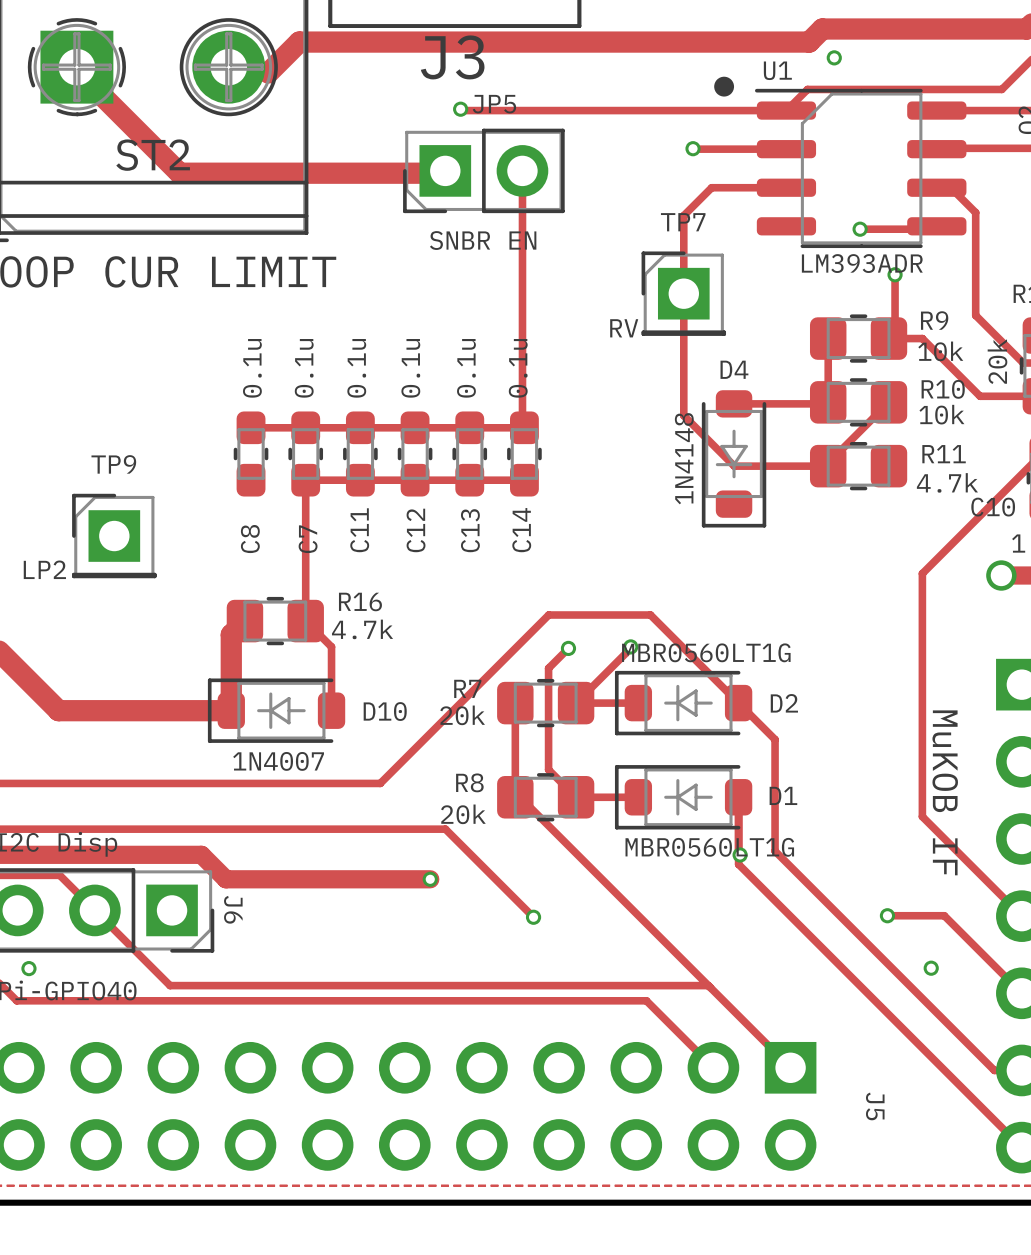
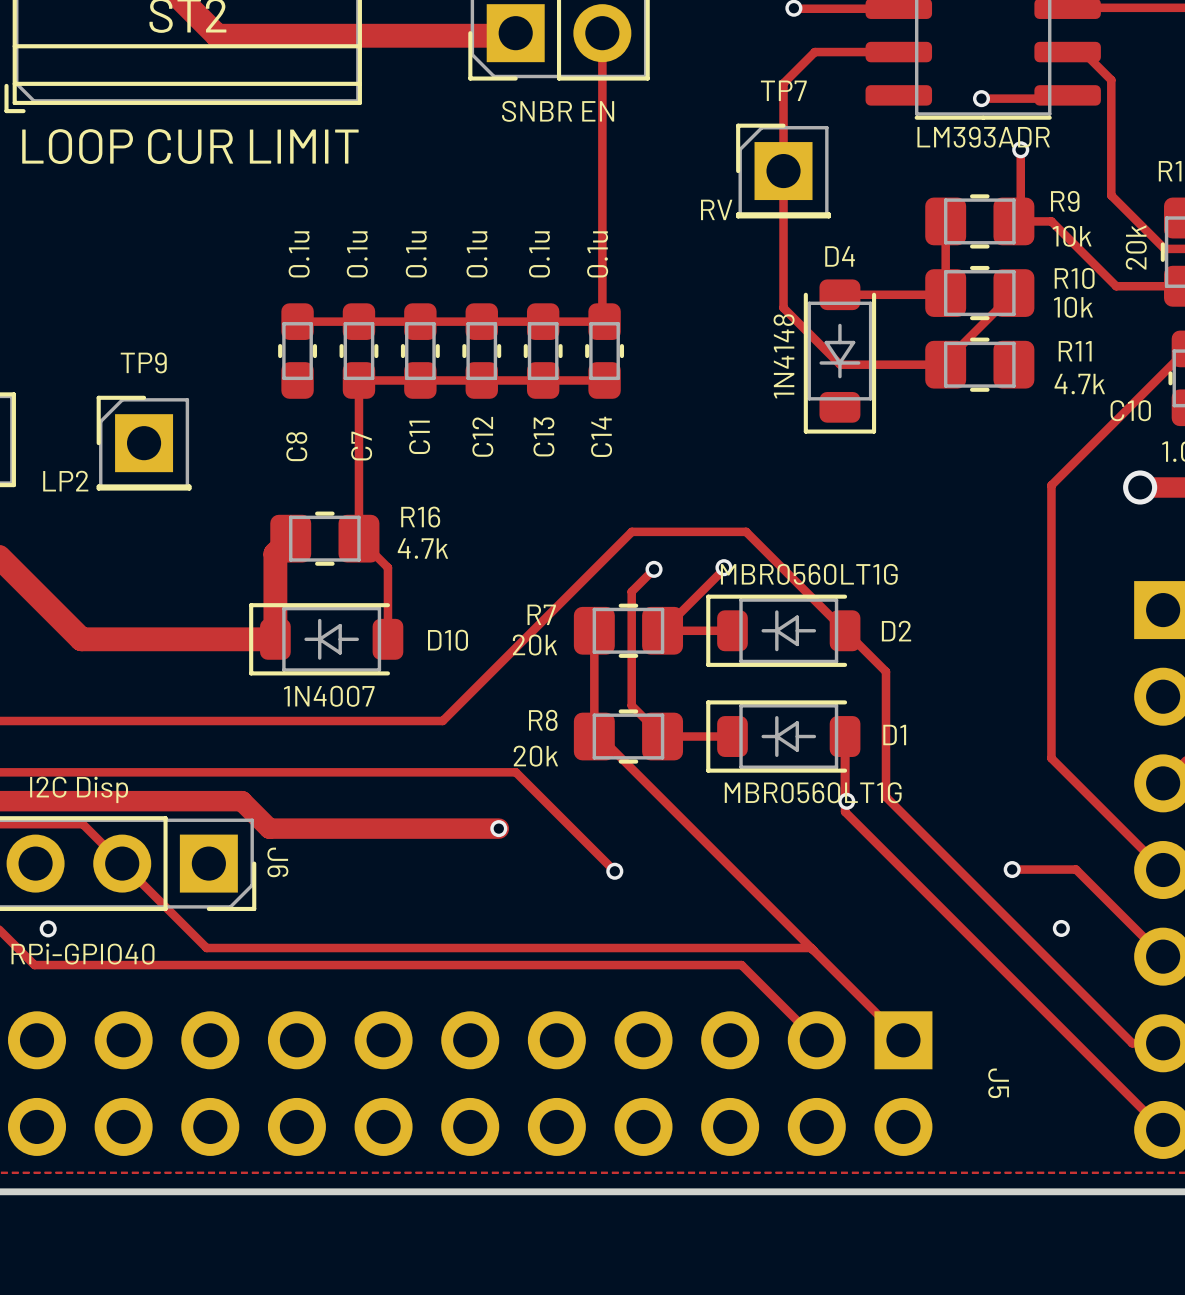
part value: MuKOB IF (945, 792) -> none

